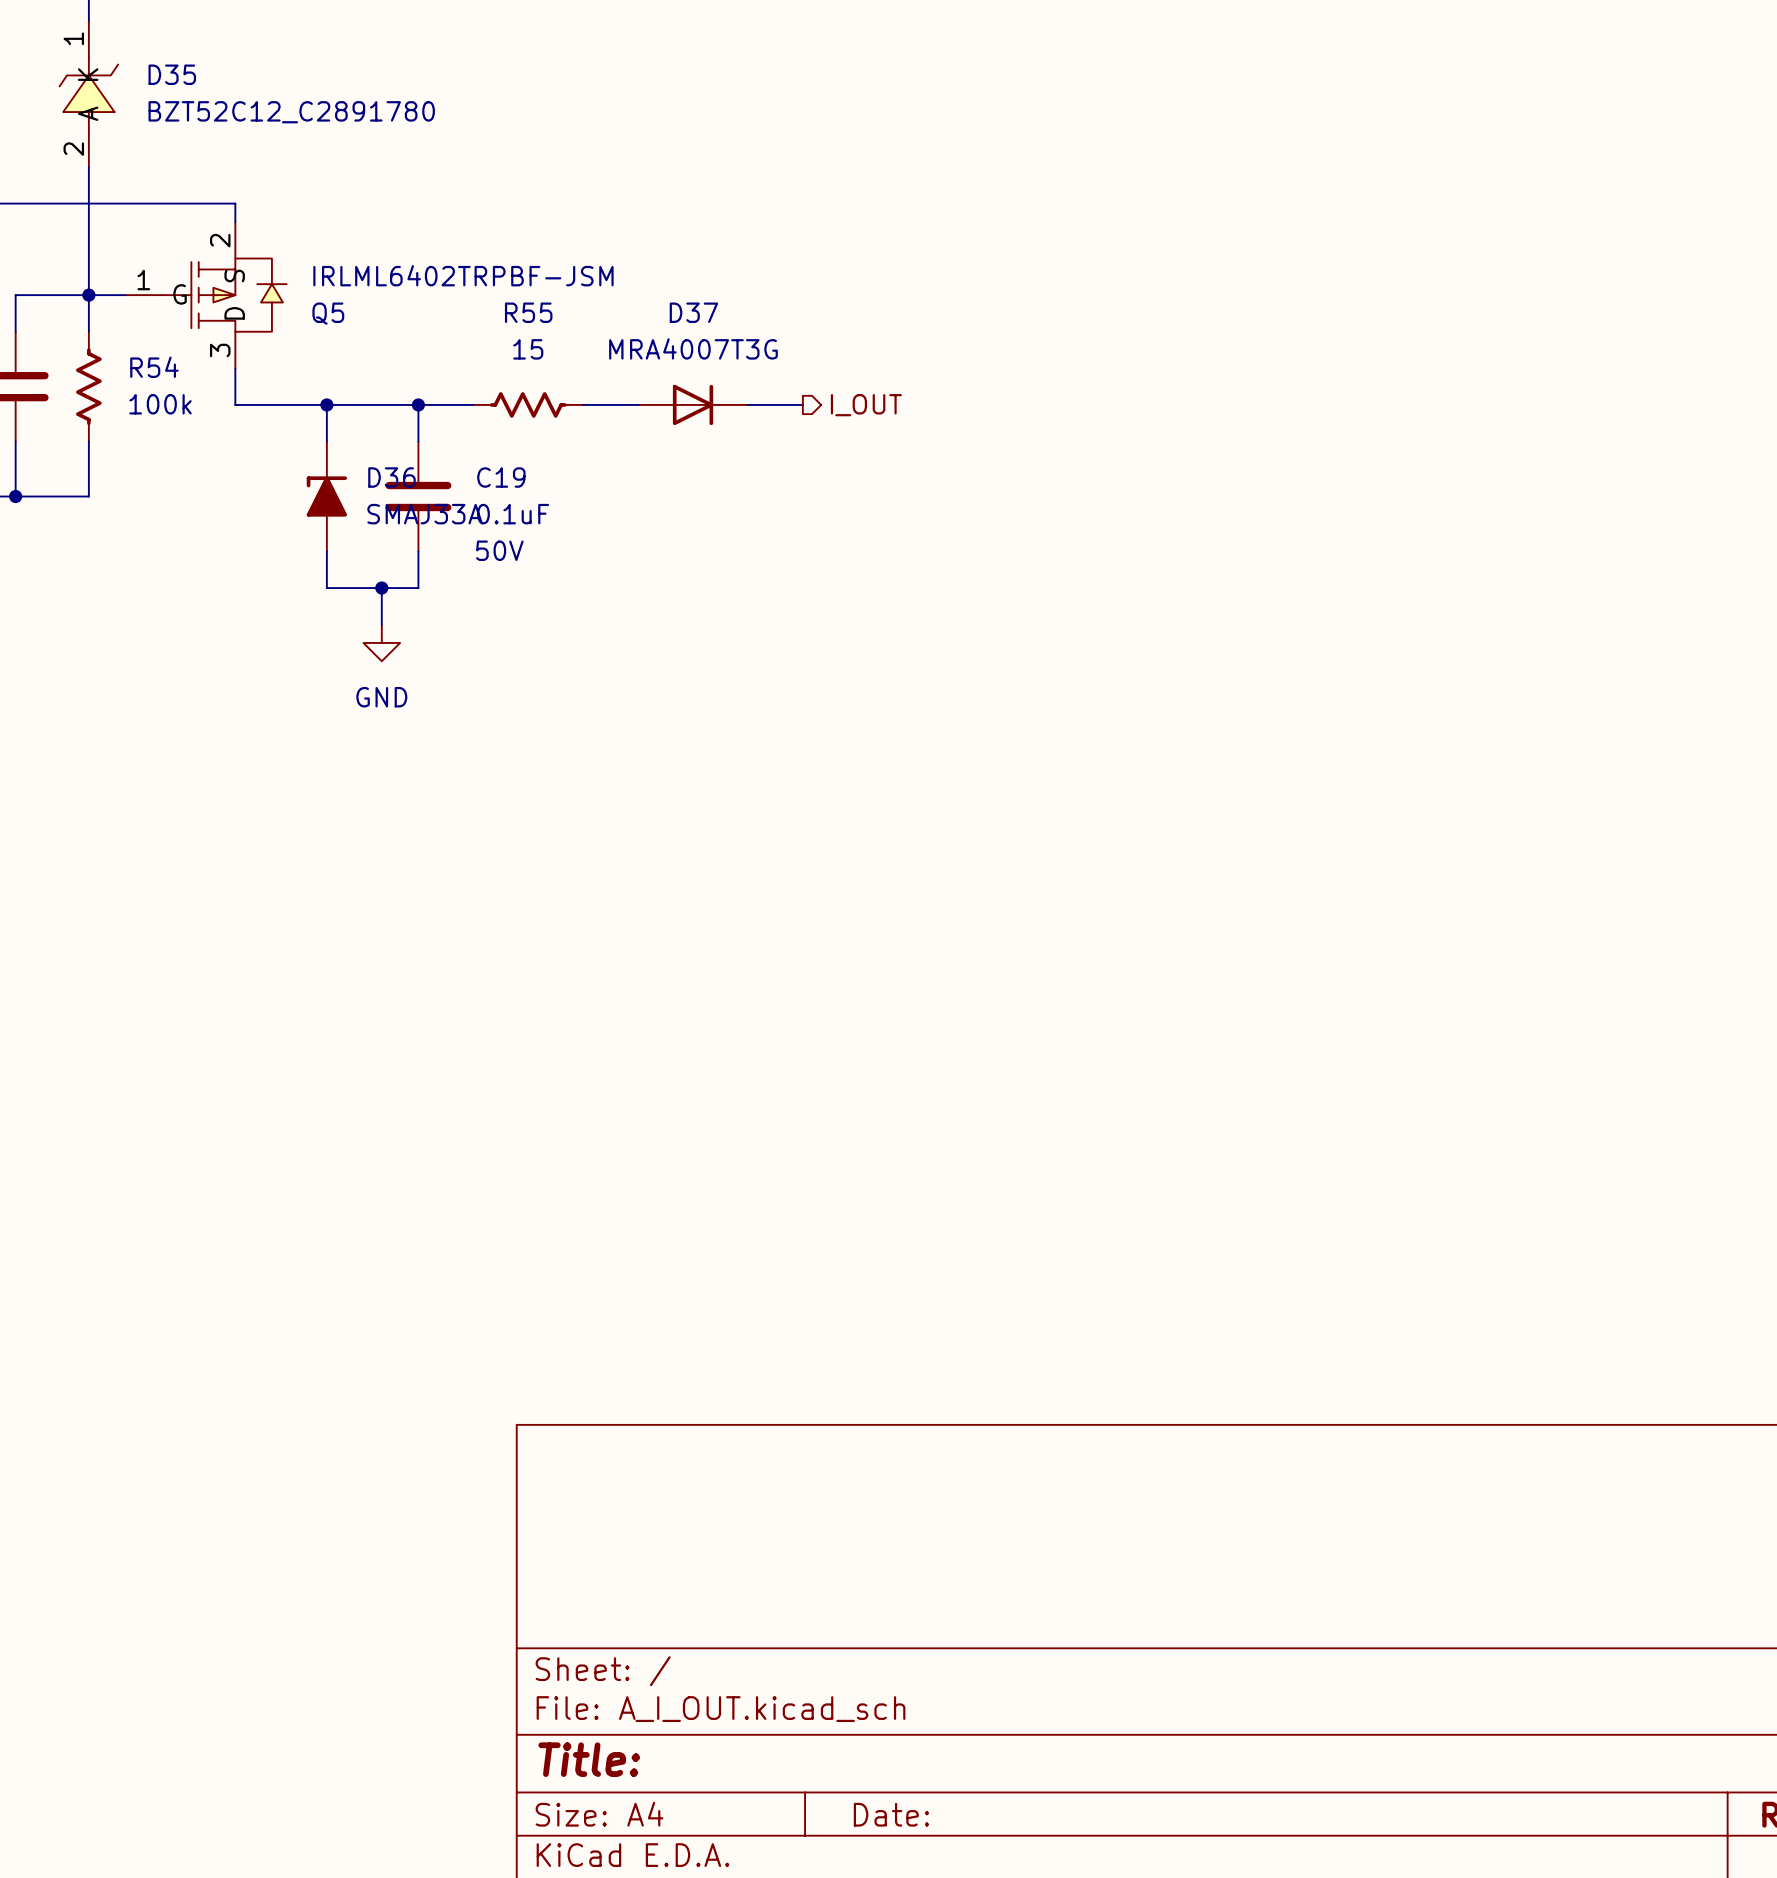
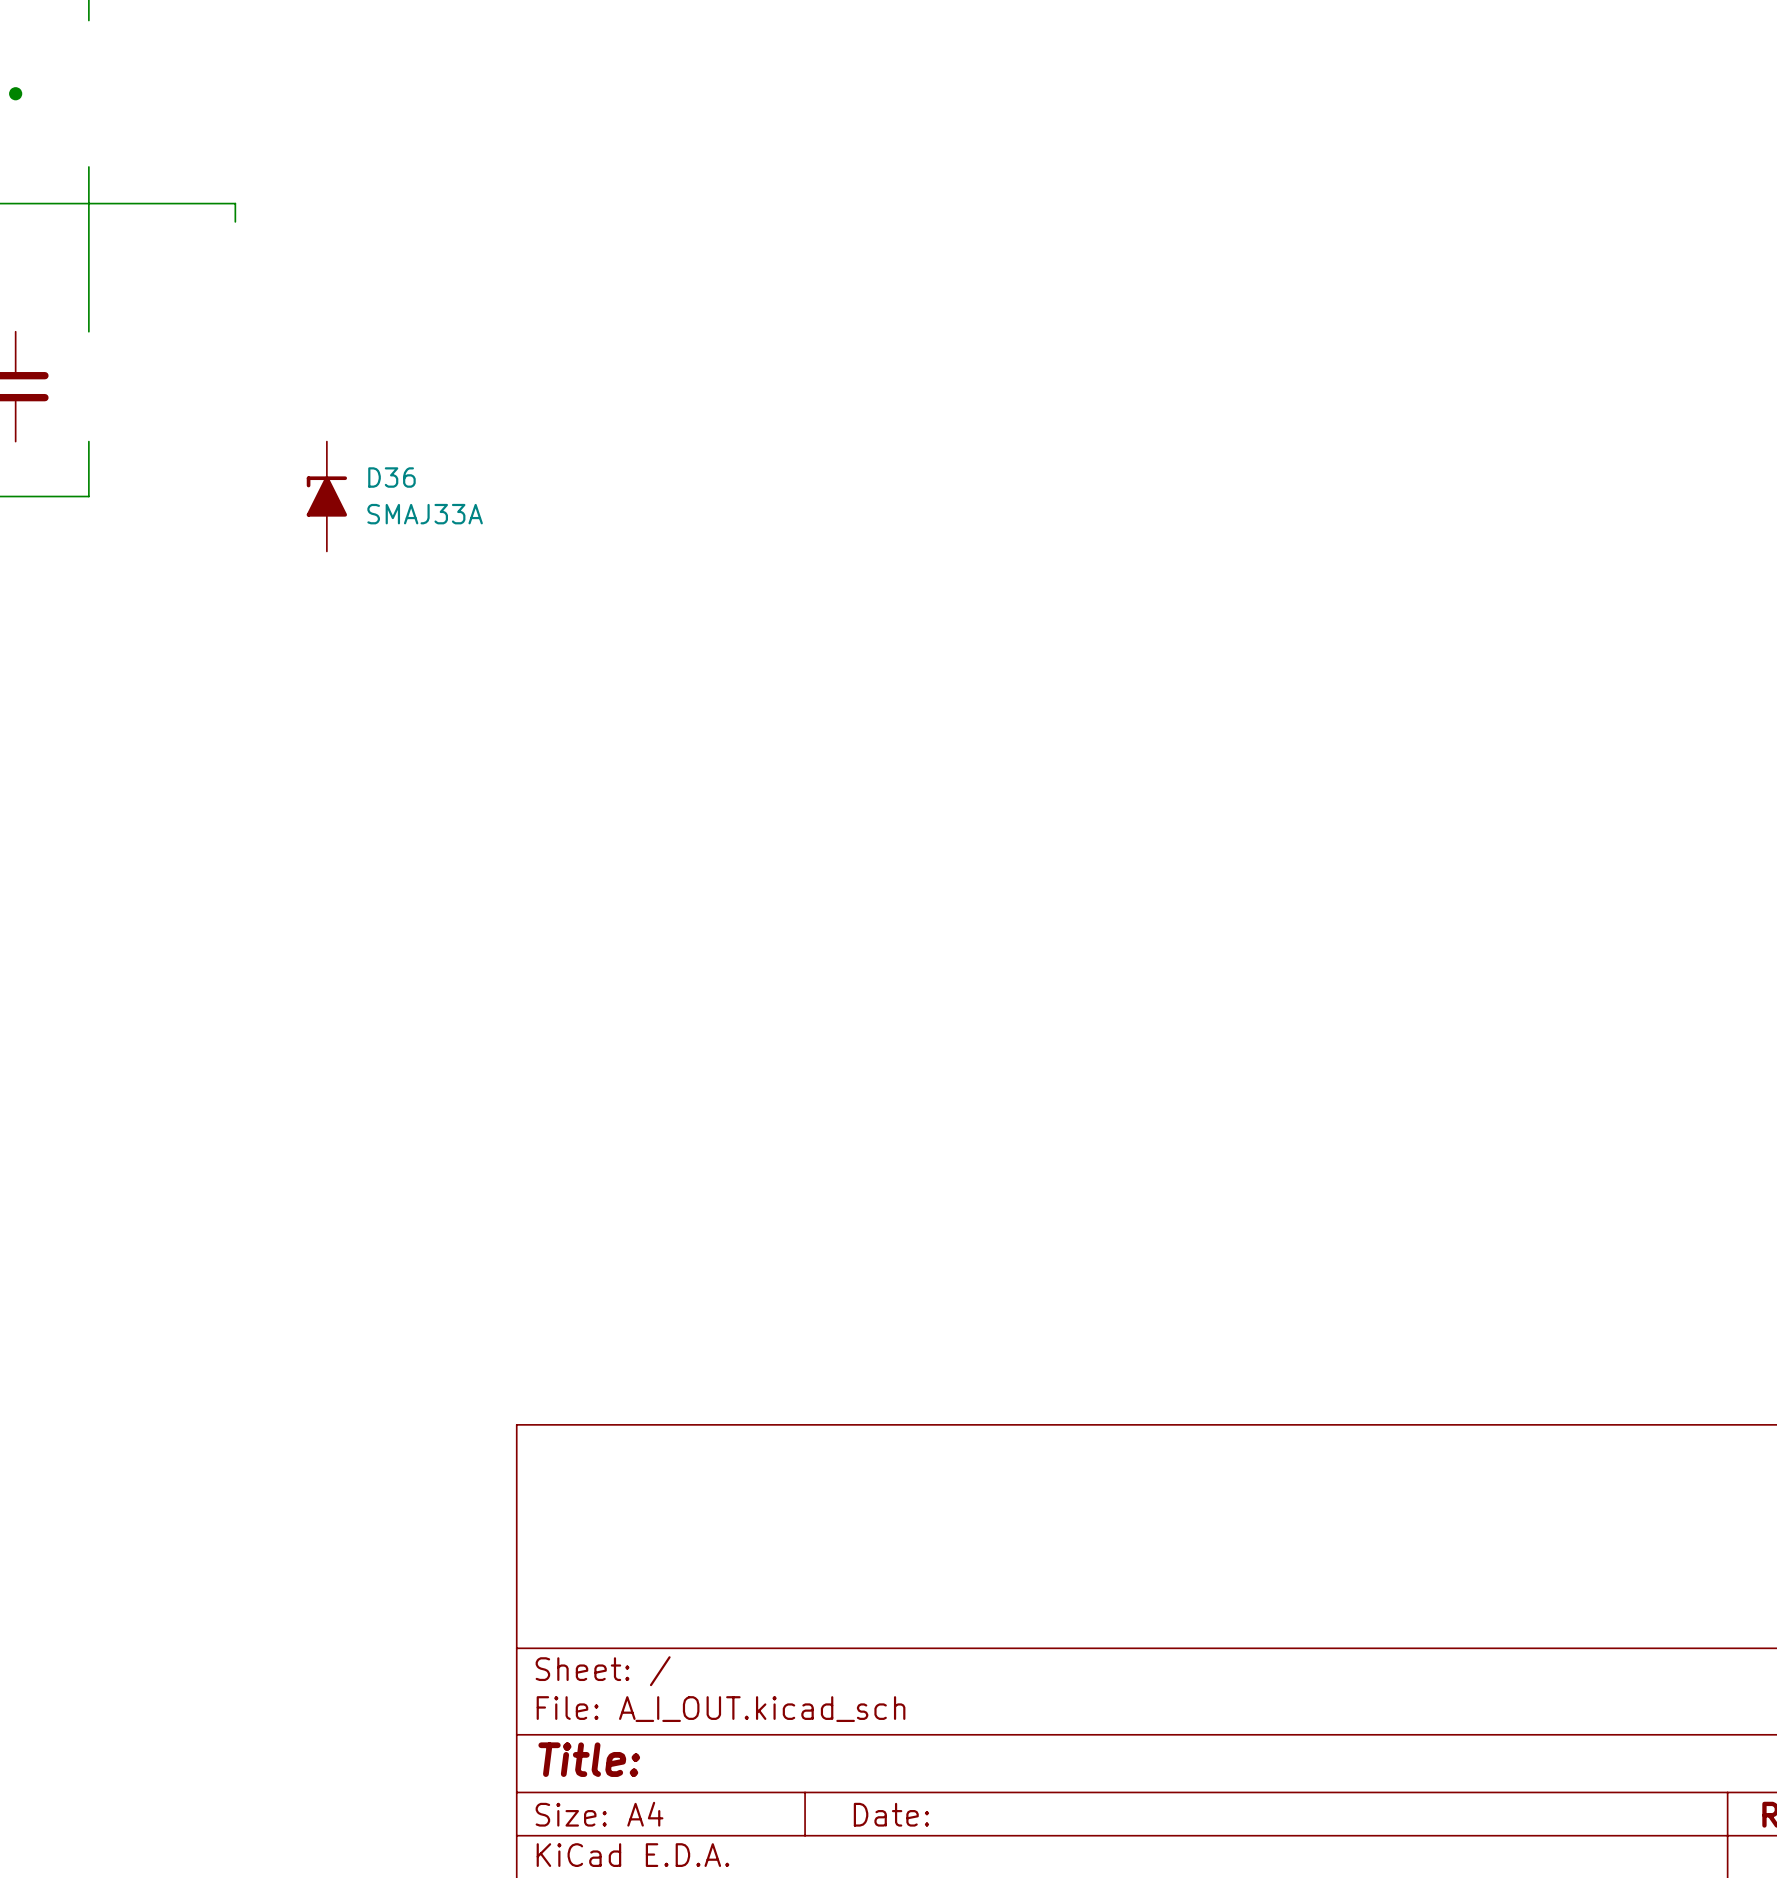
junction: none -> (15, 93)
D35: BZT52C12_C2891780 (88, 93) -> none
junction: (88, 295) -> none
wire: (125, 295) (15, 295) (15, 331) -> none
Q5: IRLML6402TRPBF-JSM (206, 295) -> none
wire: (235, 368) (235, 404) (473, 404) -> none
R54: 100k (88, 386) -> none
wire: (326, 404) (326, 441) -> none
junction: (326, 404) -> none
wire: (418, 404) (418, 441) -> none
junction: (418, 404) -> none
R55: 15 (528, 404) -> none
wire: (583, 404) (638, 404) -> none
D37: MRA4007T3G (693, 404) -> none
wire: (747, 404) (802, 404) -> none
hierarchical label: I_OUT (866, 405) -> none
wire: (15, 441) (15, 496) -> none
junction: (15, 496) -> none
C19: 0.1uF (418, 496) -> none
wire: (326, 551) (326, 588) (418, 588) (418, 551) -> none
wire: (381, 588) (381, 624) -> none
junction: (381, 588) -> none
power symbol: GND (381, 642) -> none

